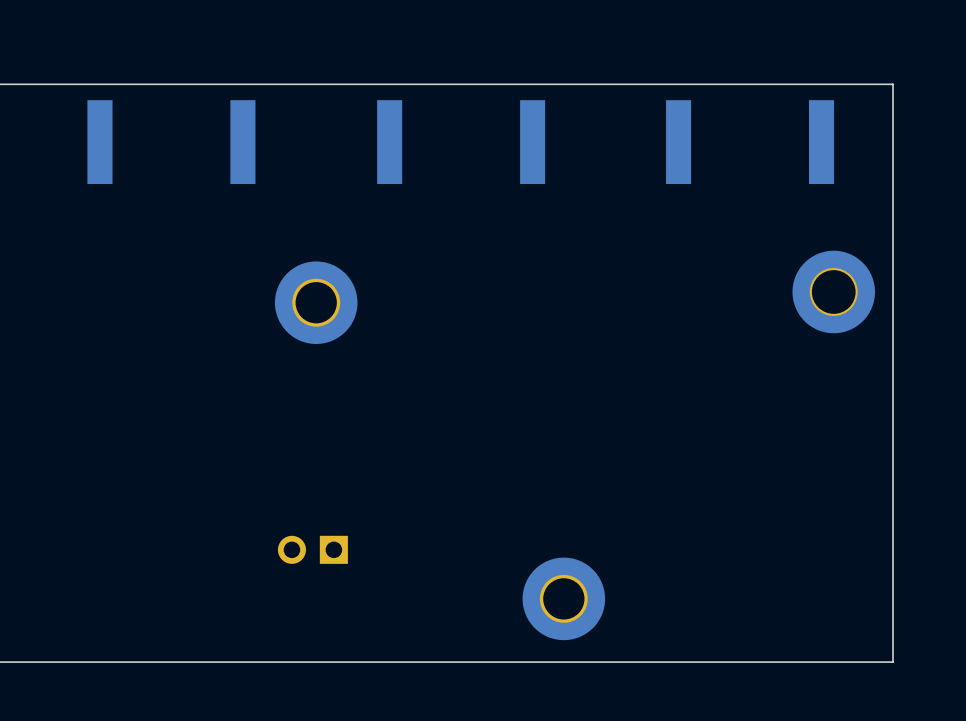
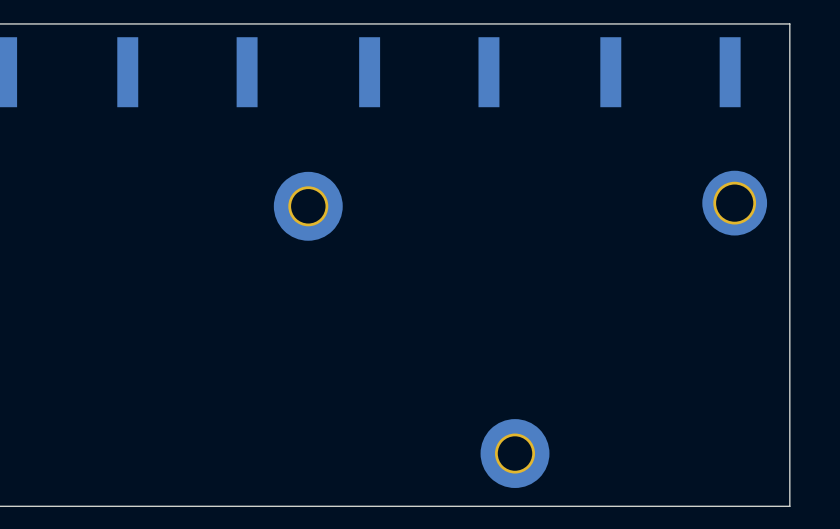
part footprint: [792, 250, 876, 334] -> [702, 170, 768, 236]
part: (312, 549) -> none

